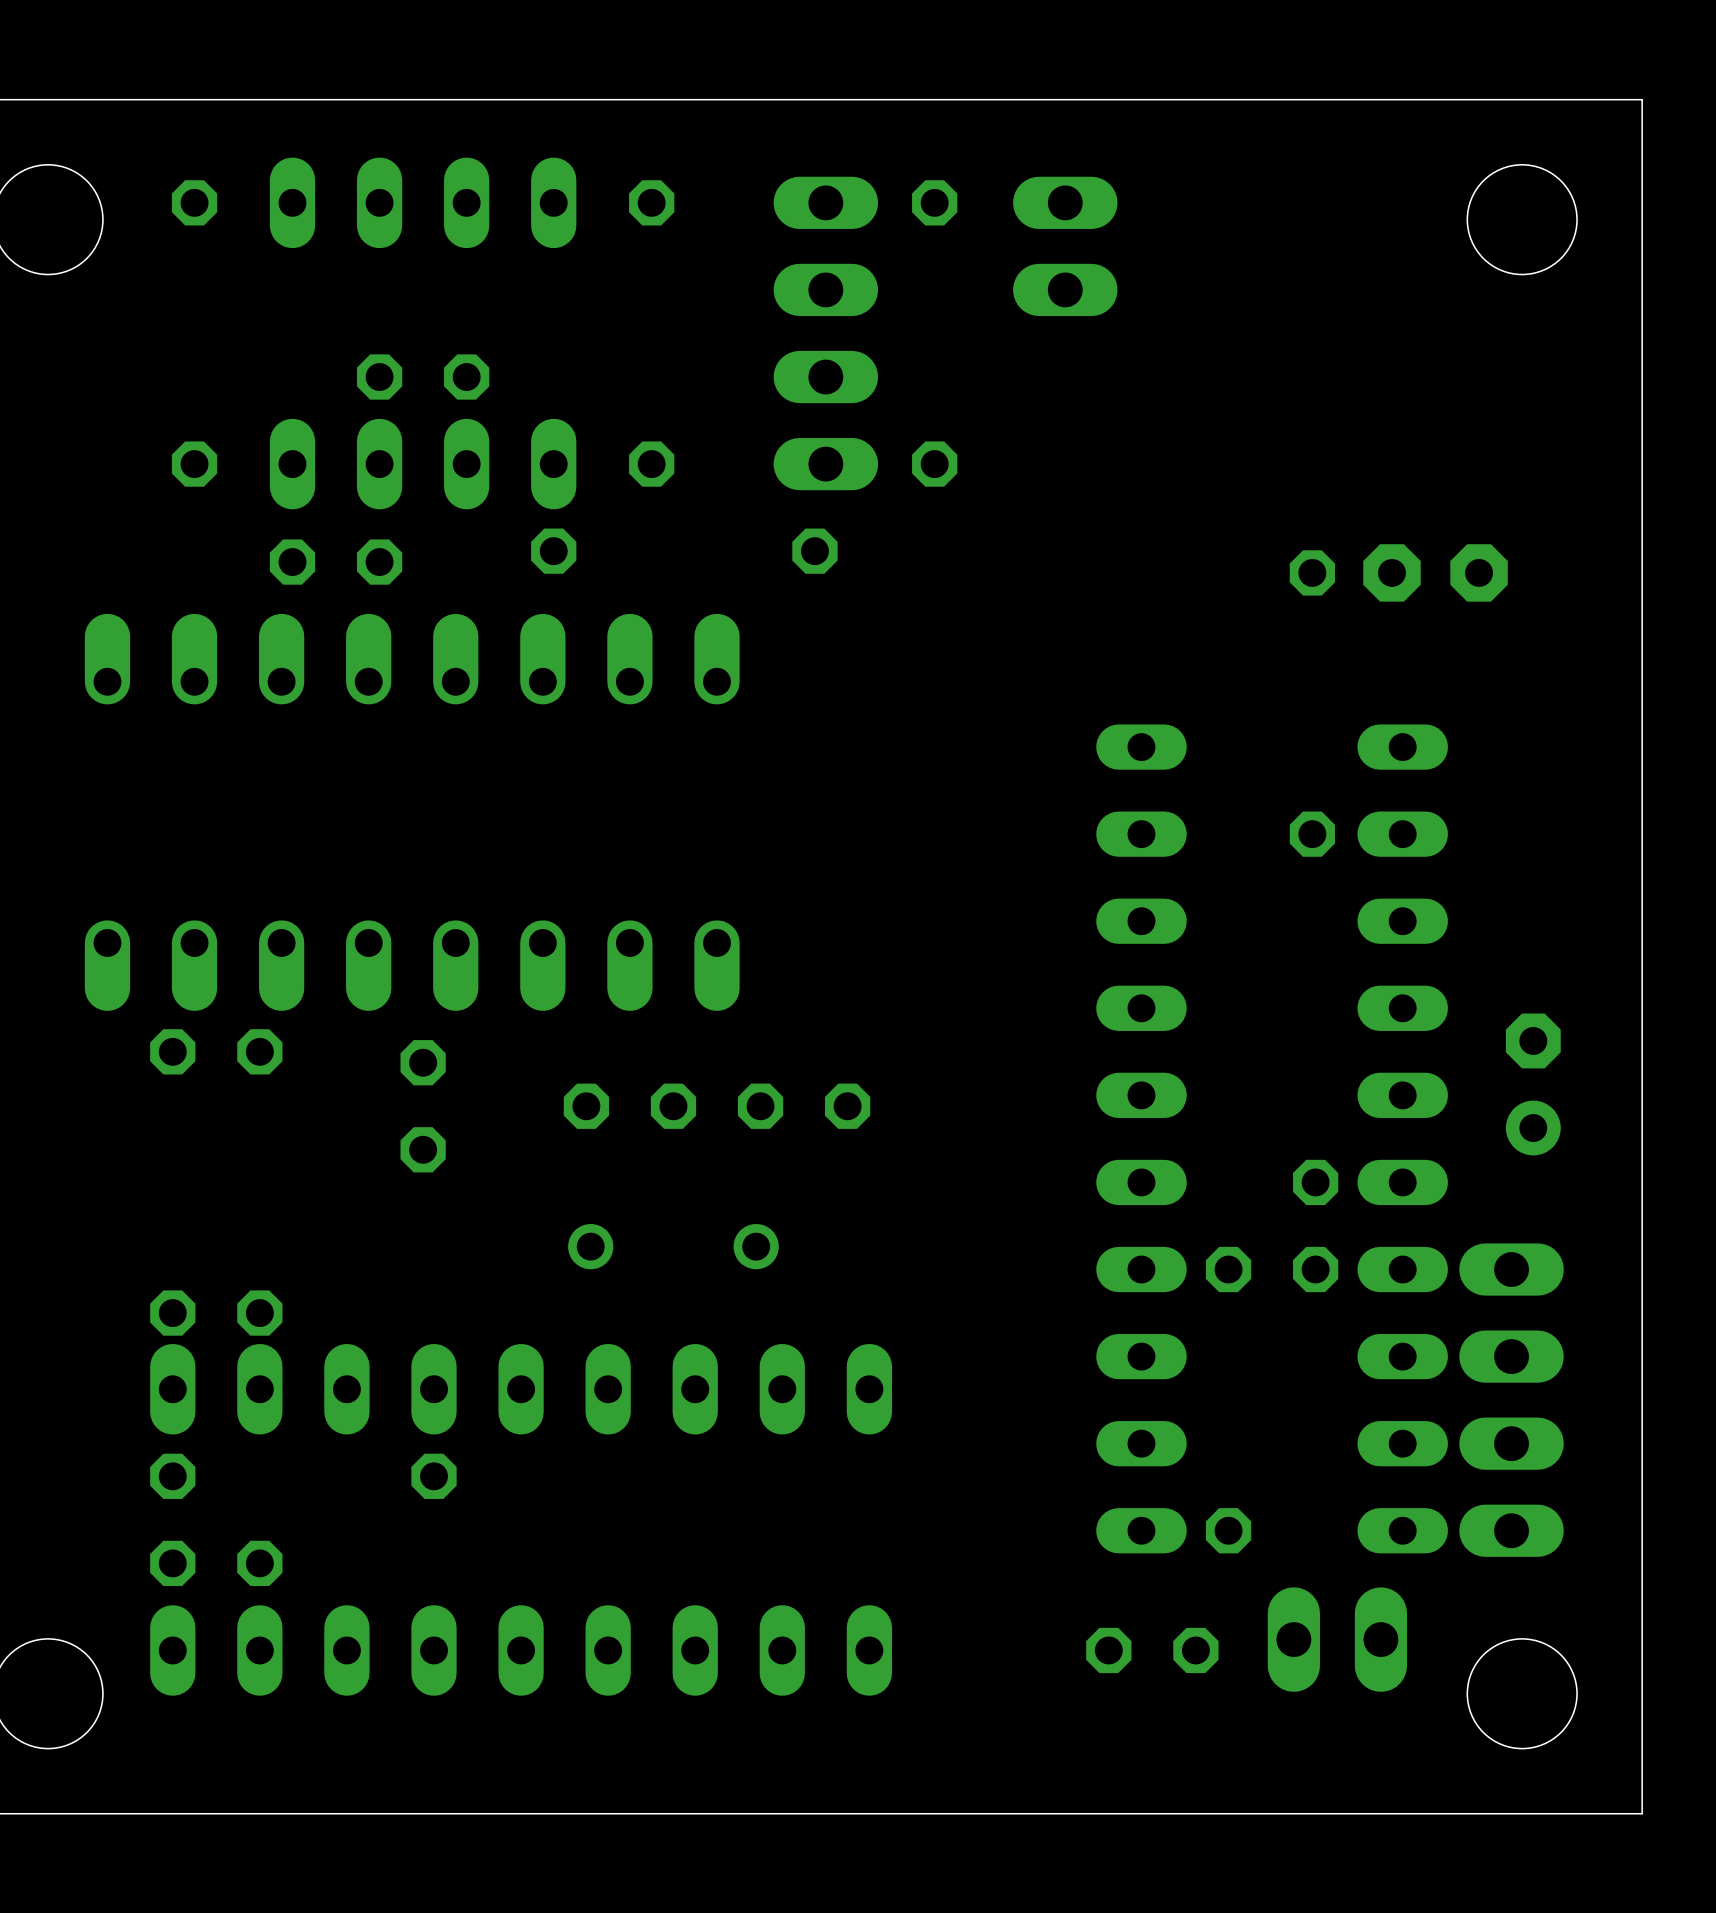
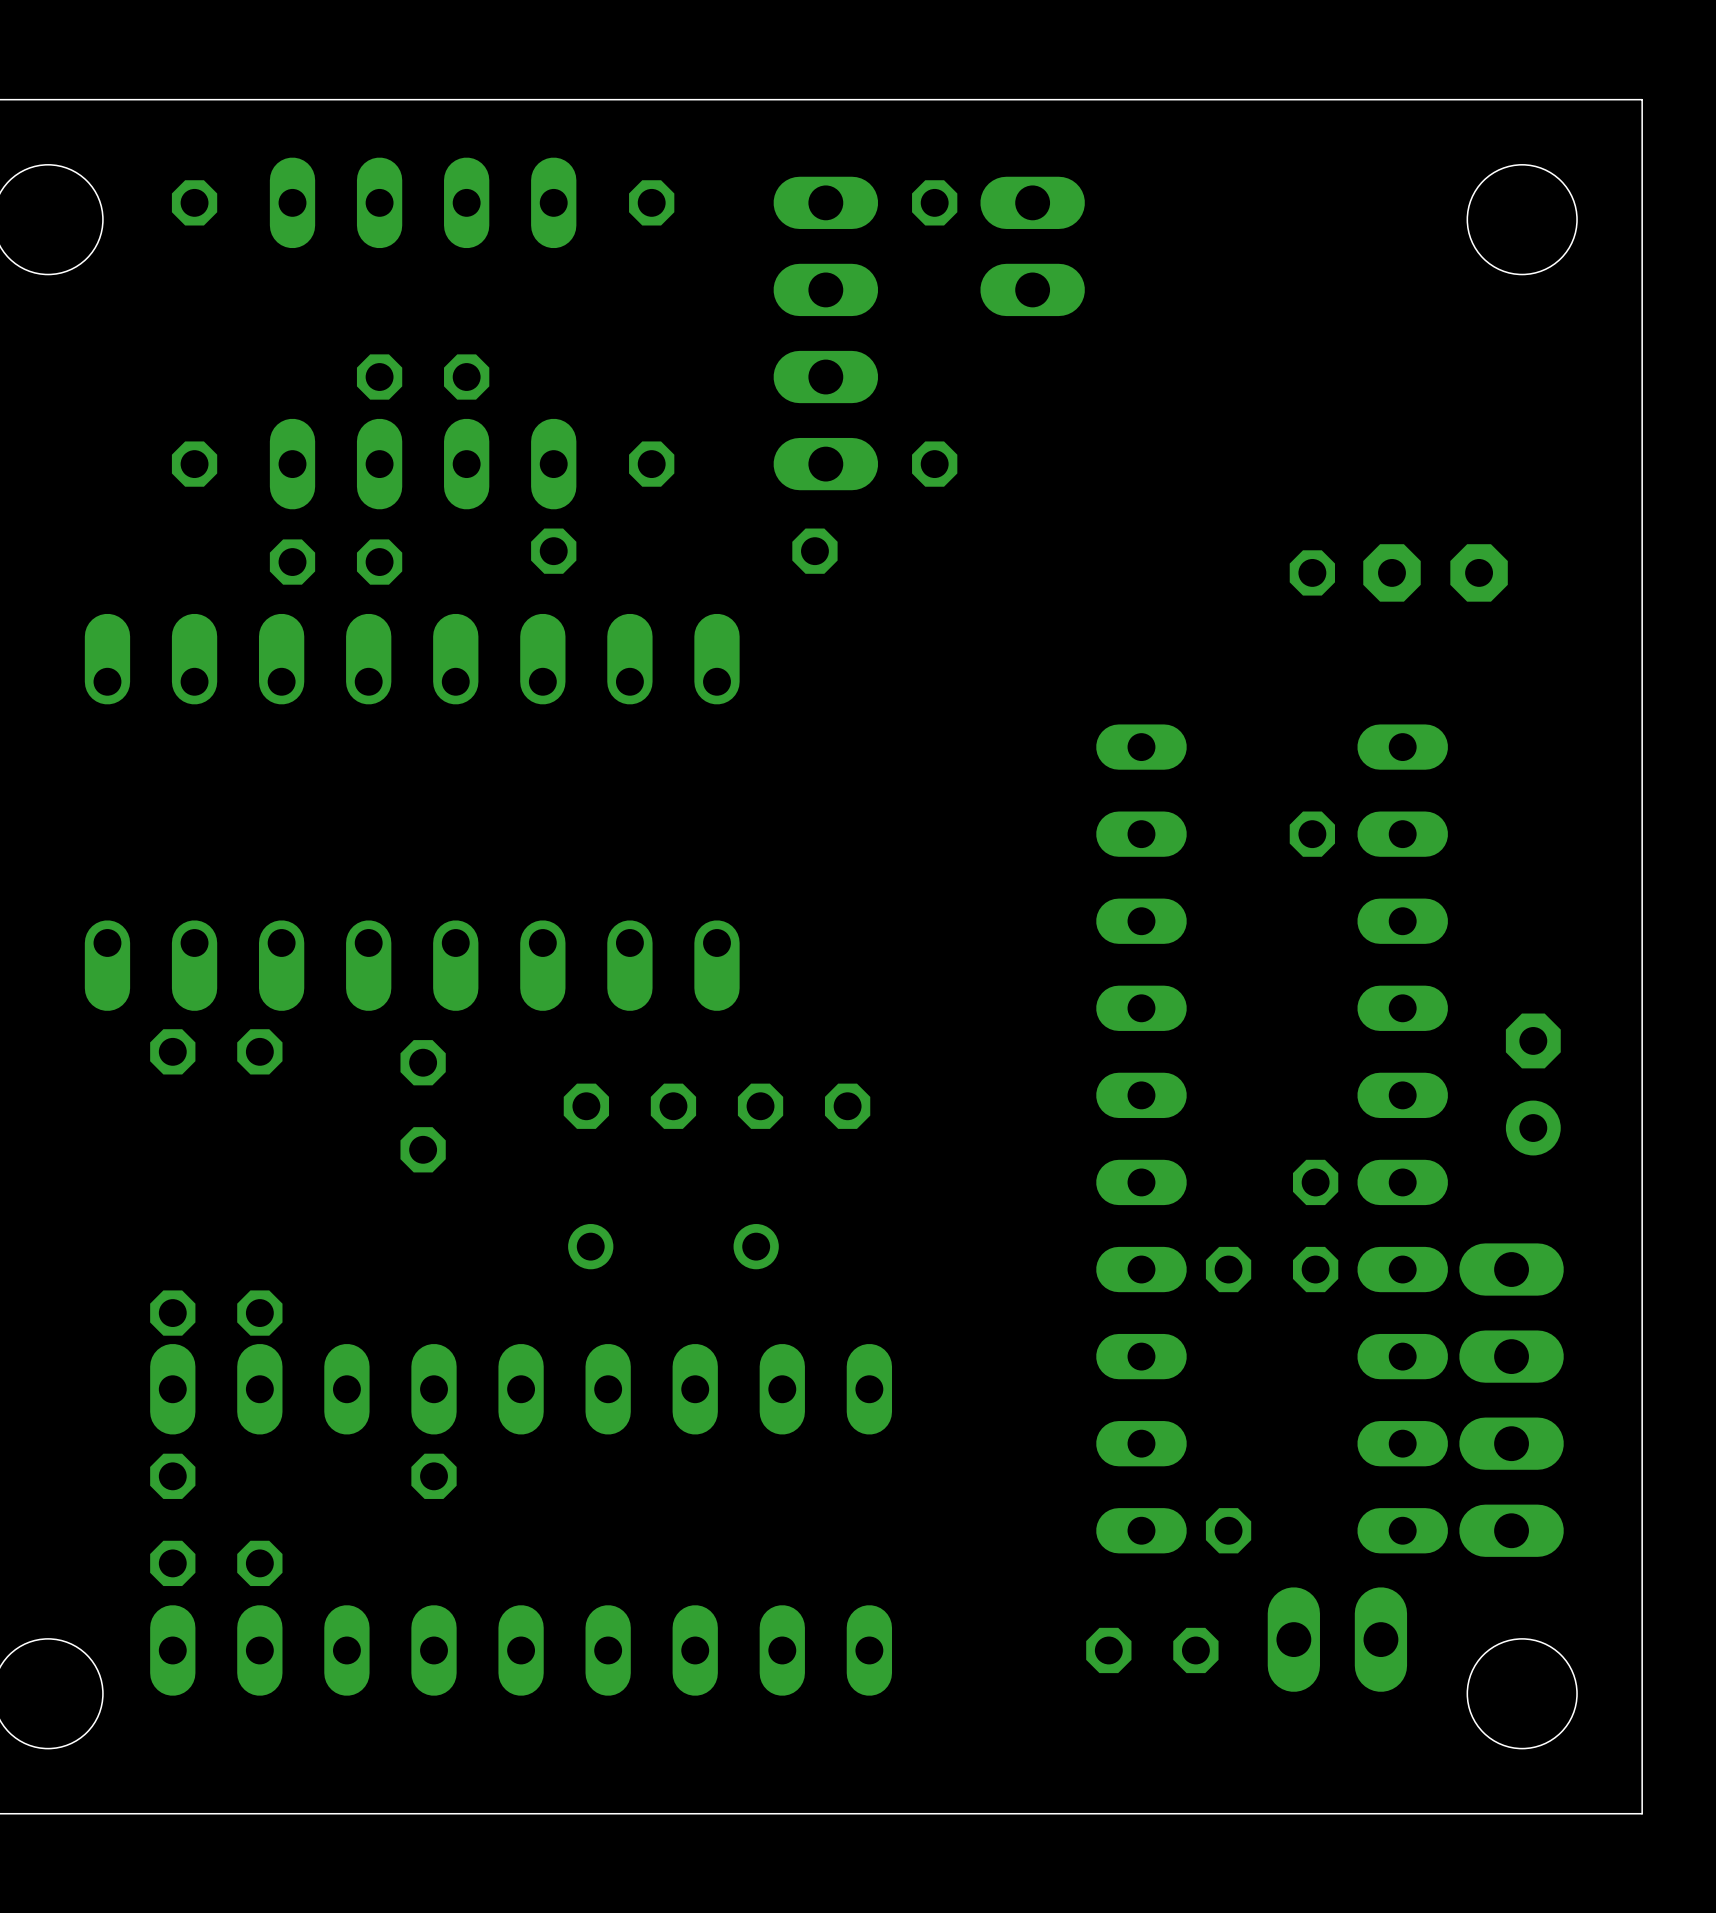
part position: (1065, 246) -> (1032, 246)

